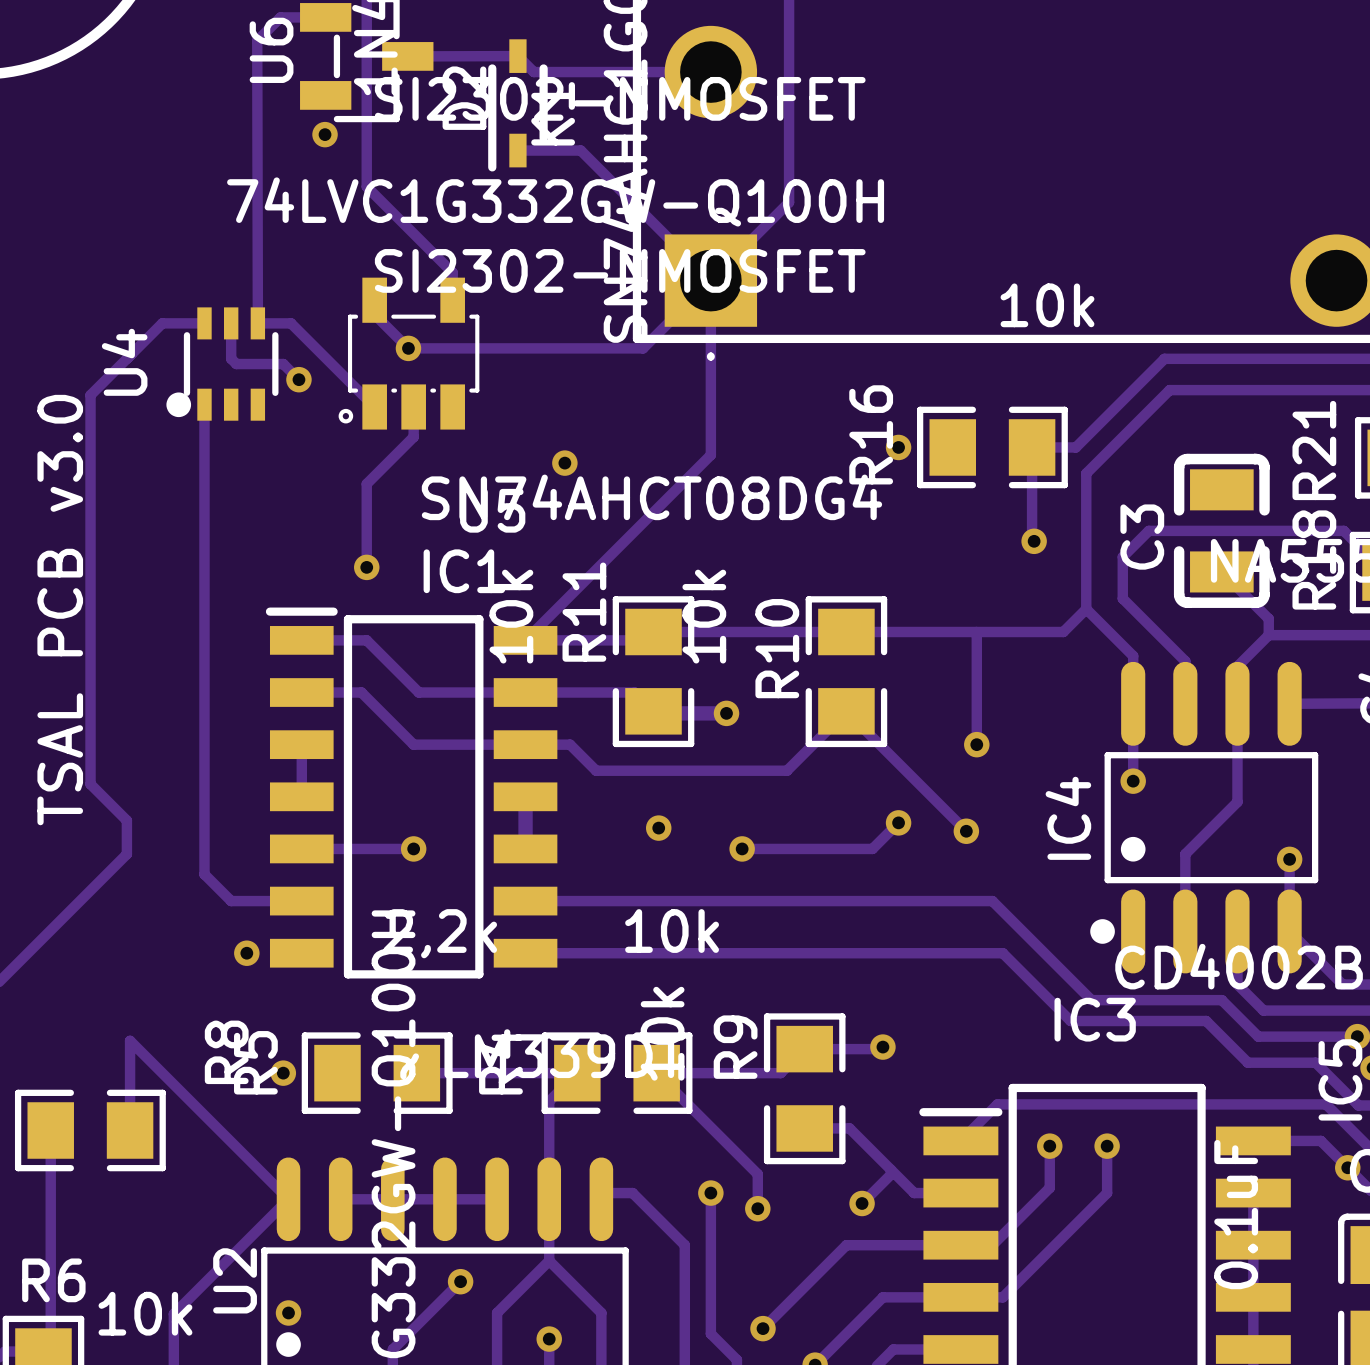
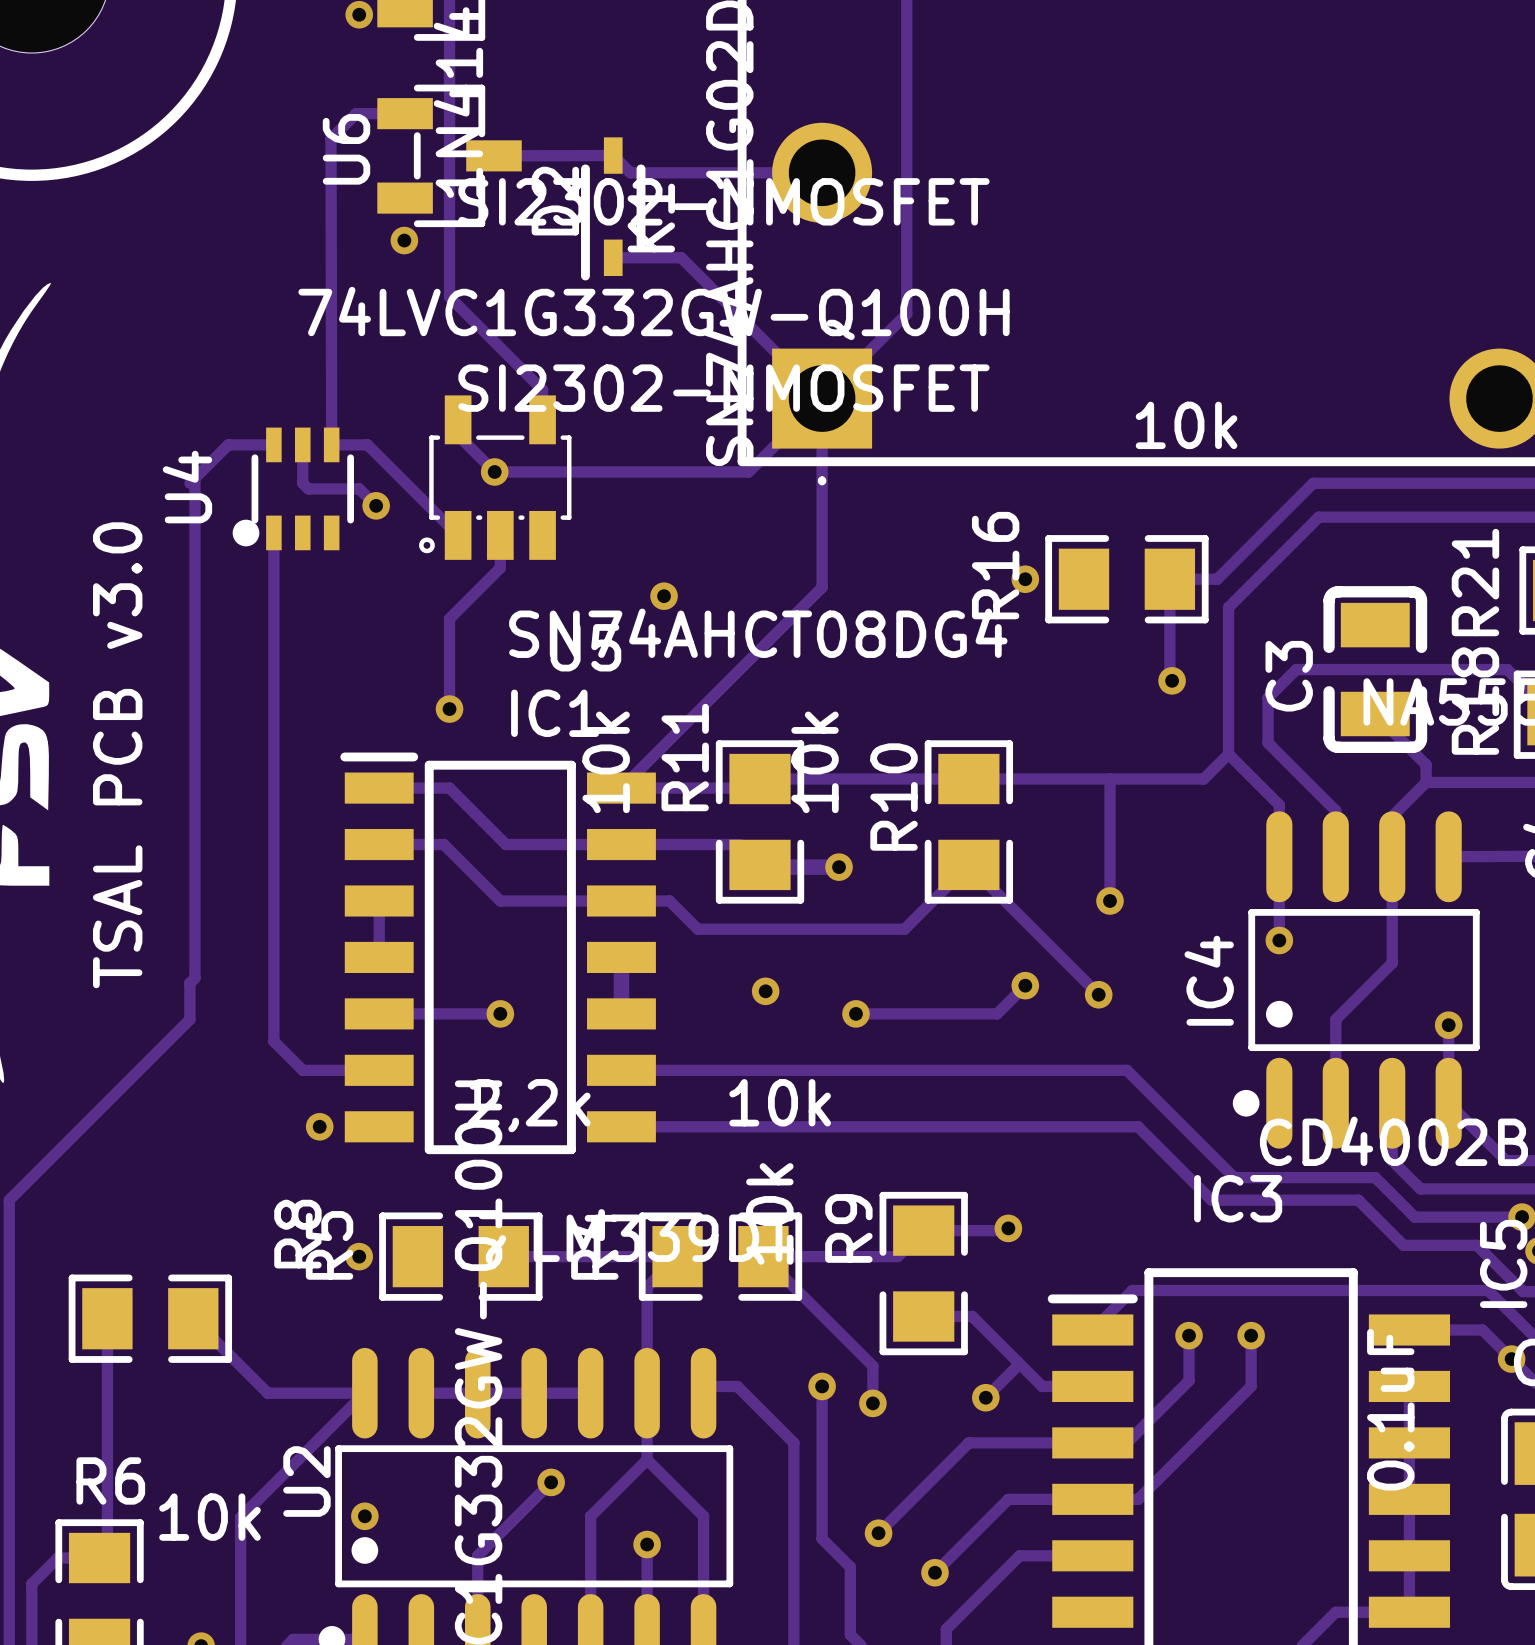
track: (126, 358) (90, 395) (90, 784) (126, 820) -> (194, 478) (194, 978) (189, 983)
track: (130, 1130) (130, 1040) (288, 1199) -> (193, 1318) (267, 1393) (364, 1393)

